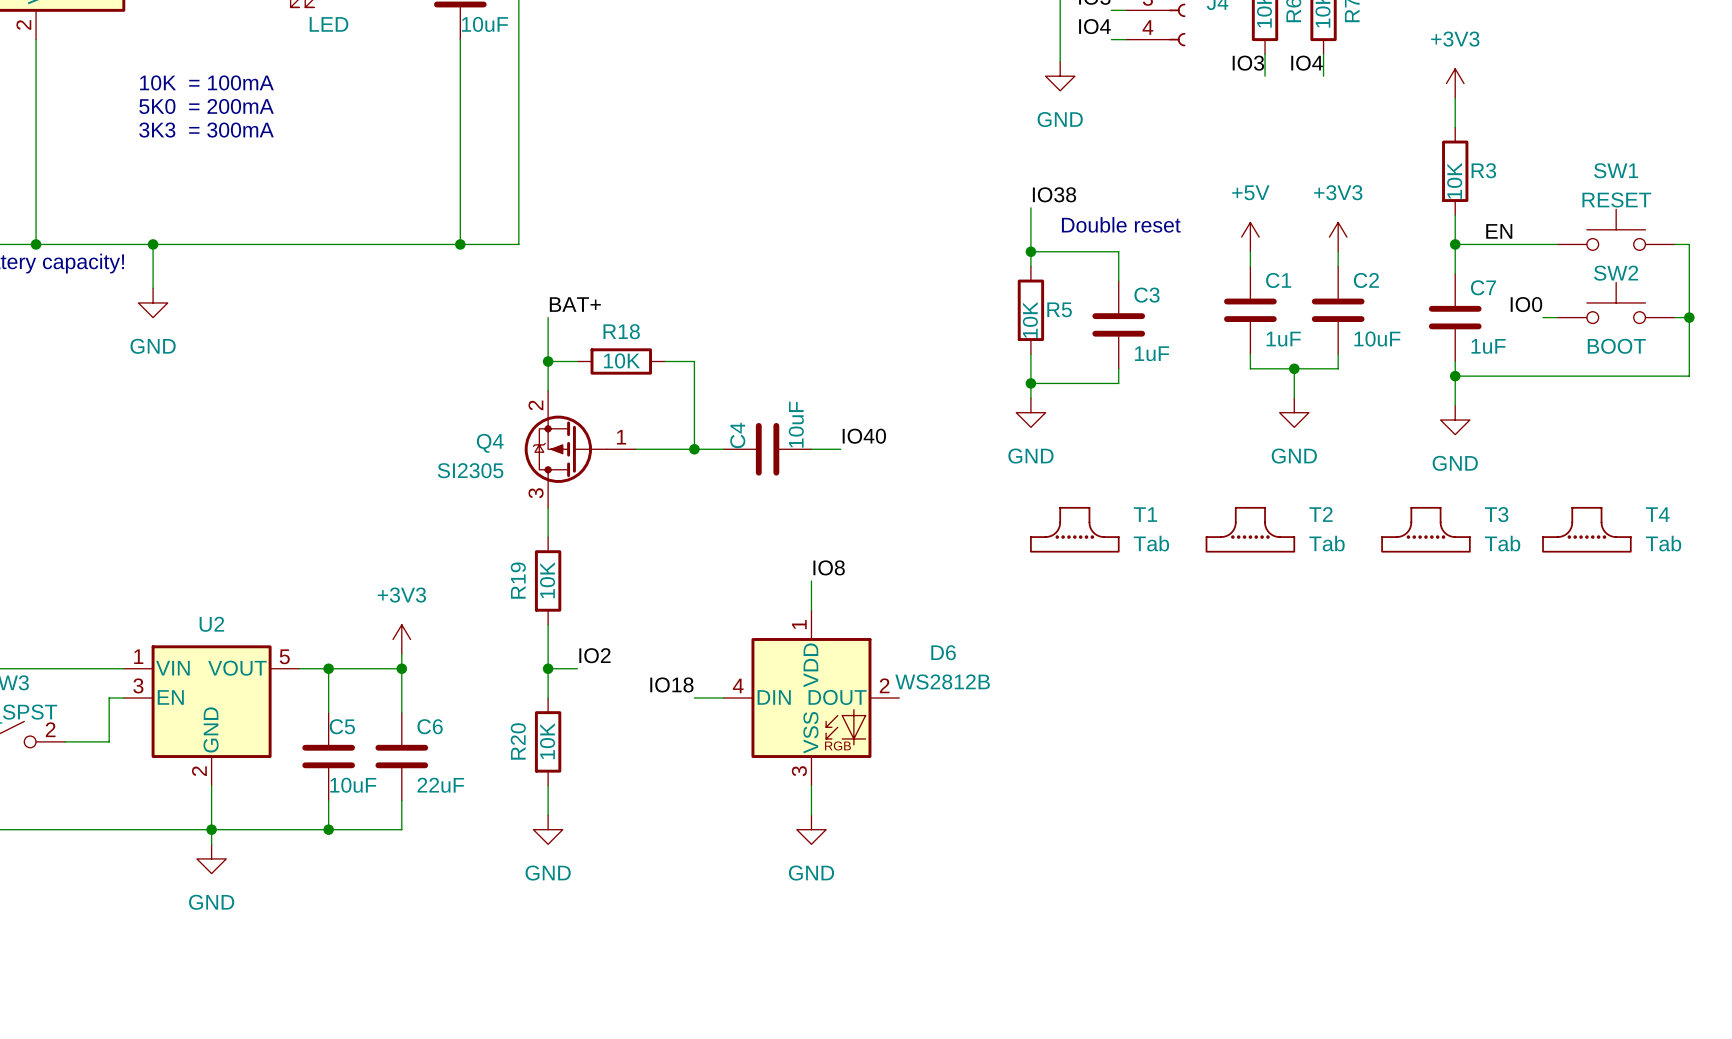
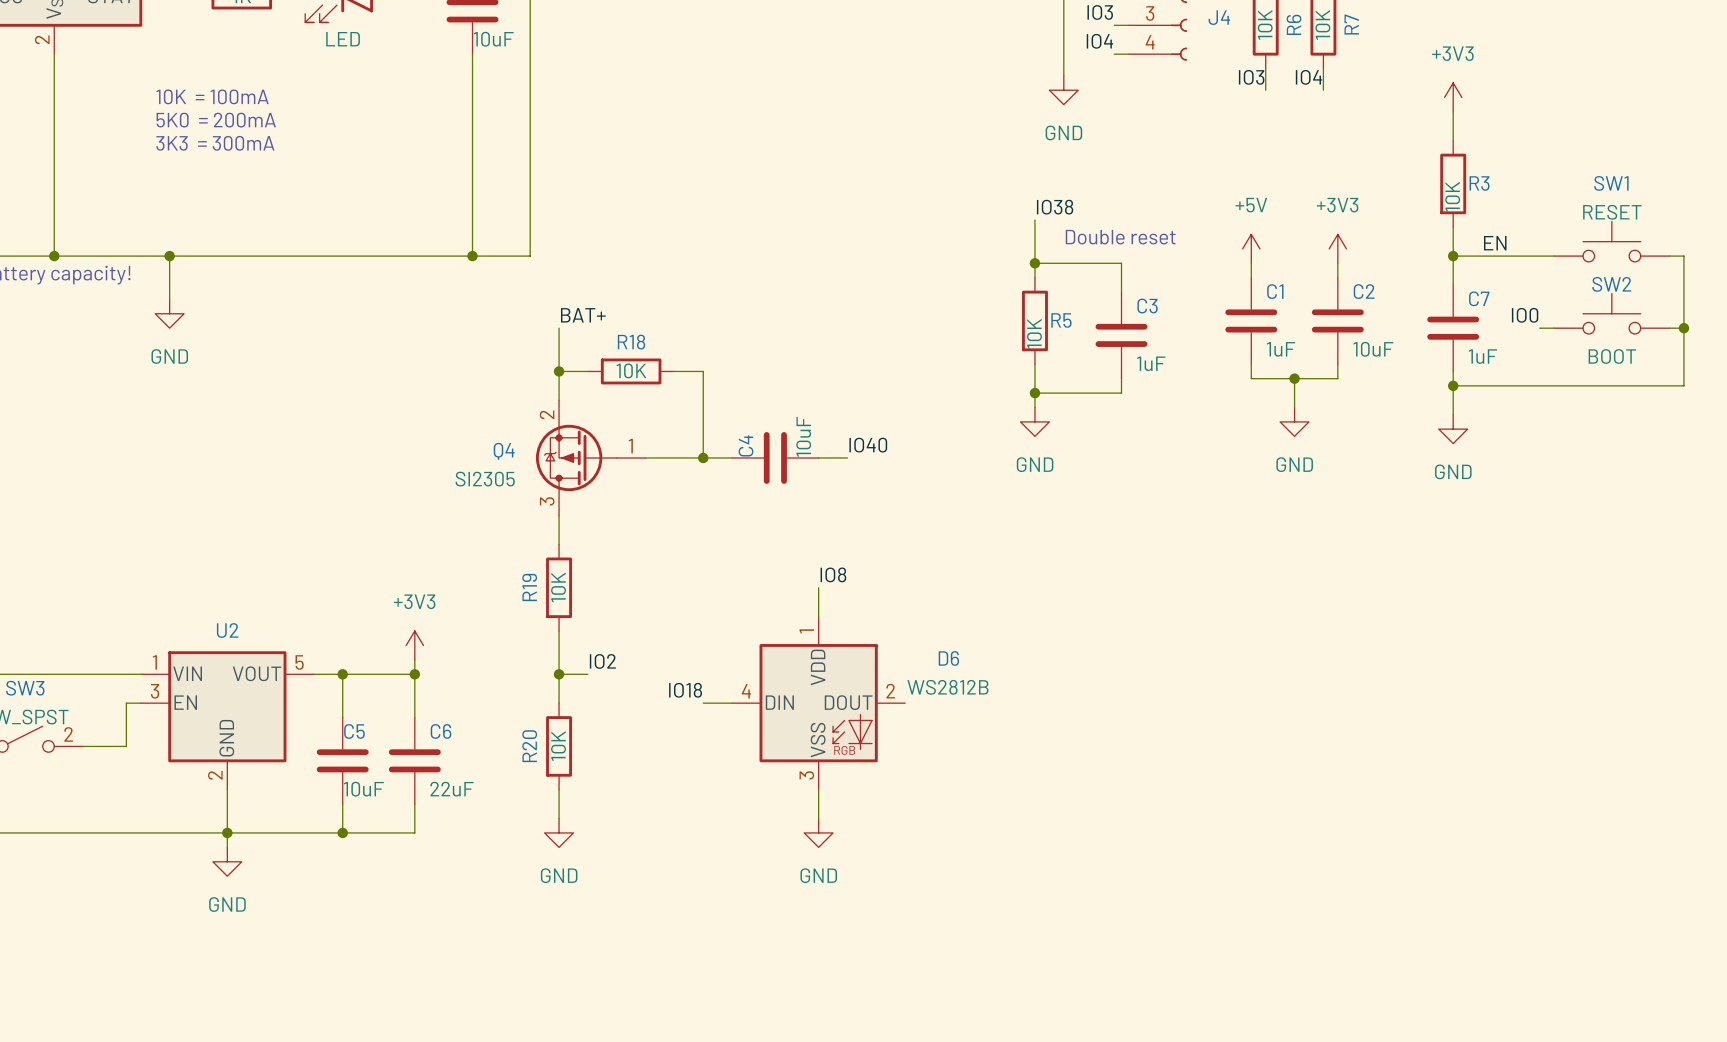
T1: Tab (1074, 529) -> none
T2: Tab (1250, 529) -> none
T3: Tab (1425, 529) -> none
T4: Tab (1586, 529) -> none

